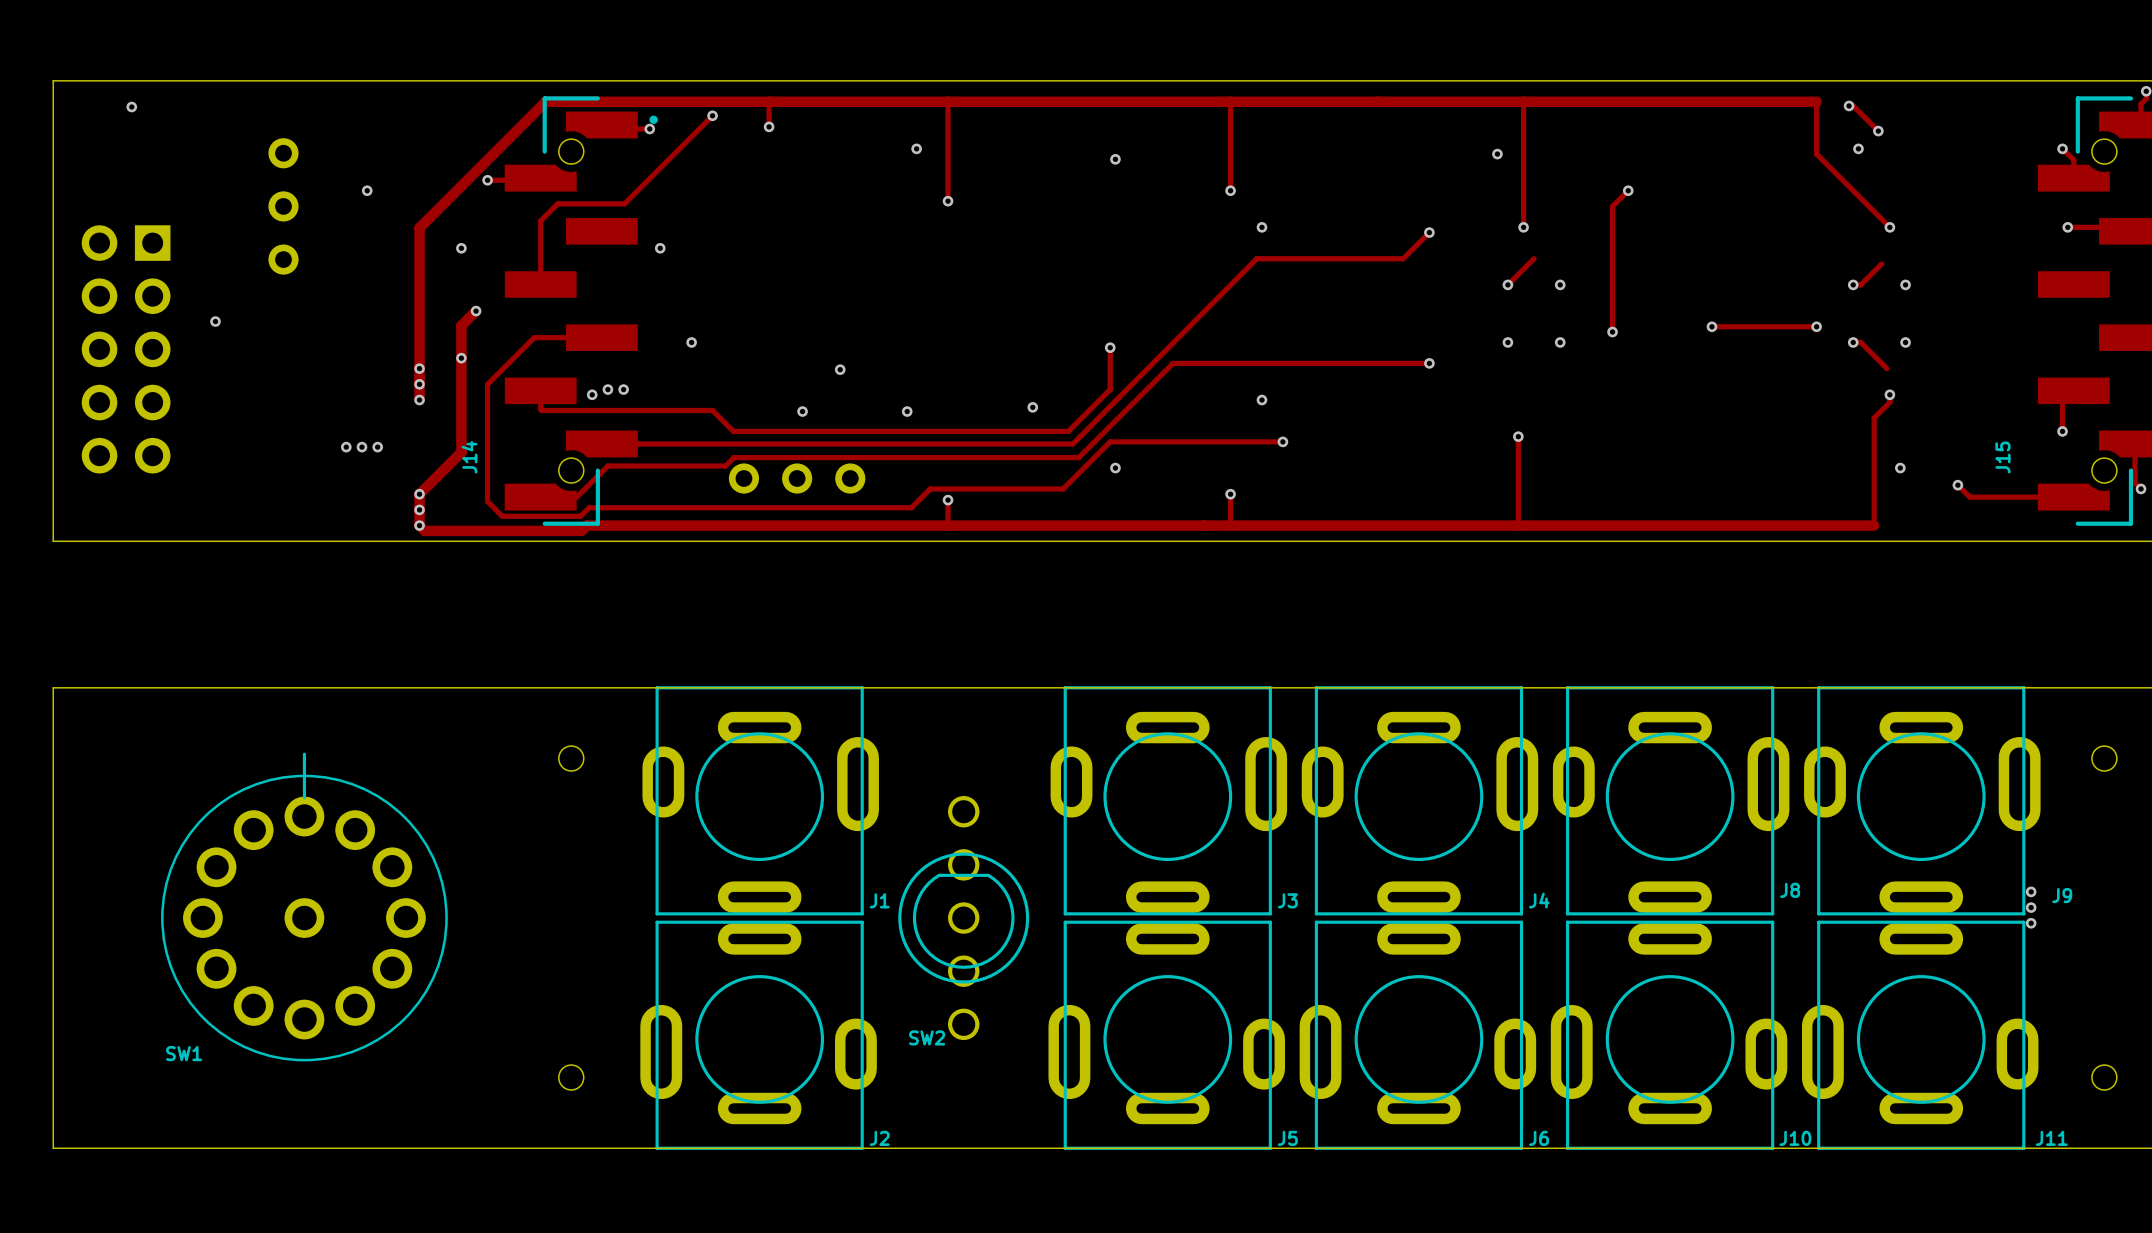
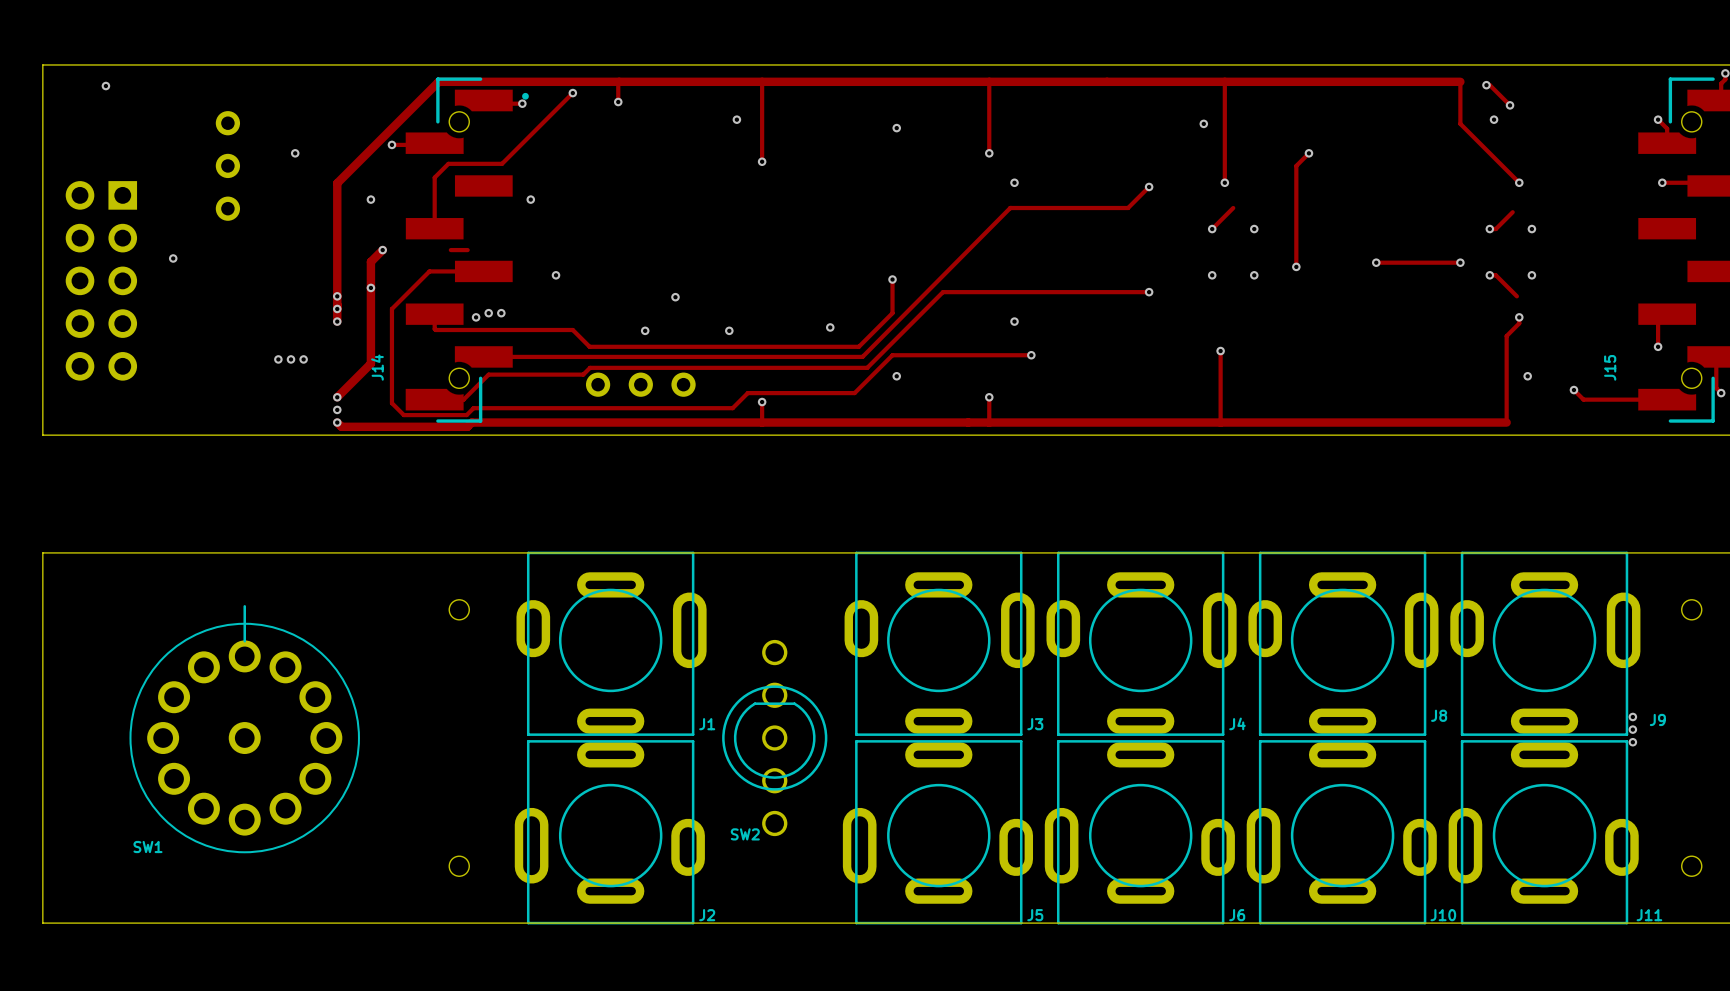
track: none -> (450, 250) (467, 250)
track: (419, 494) (419, 525) -> none

